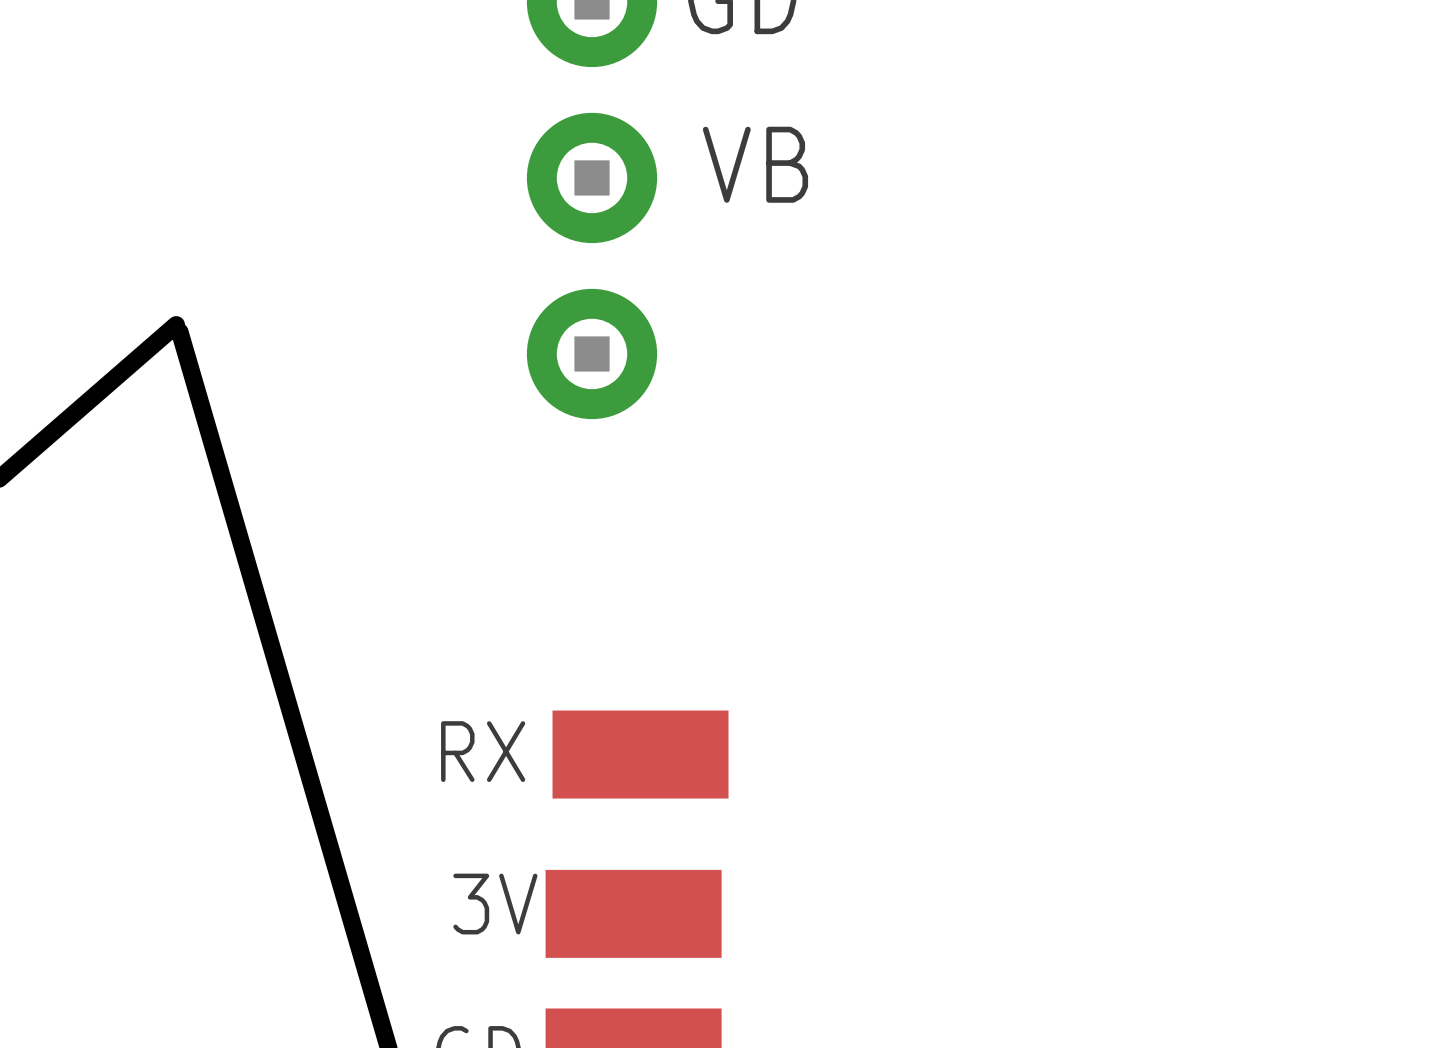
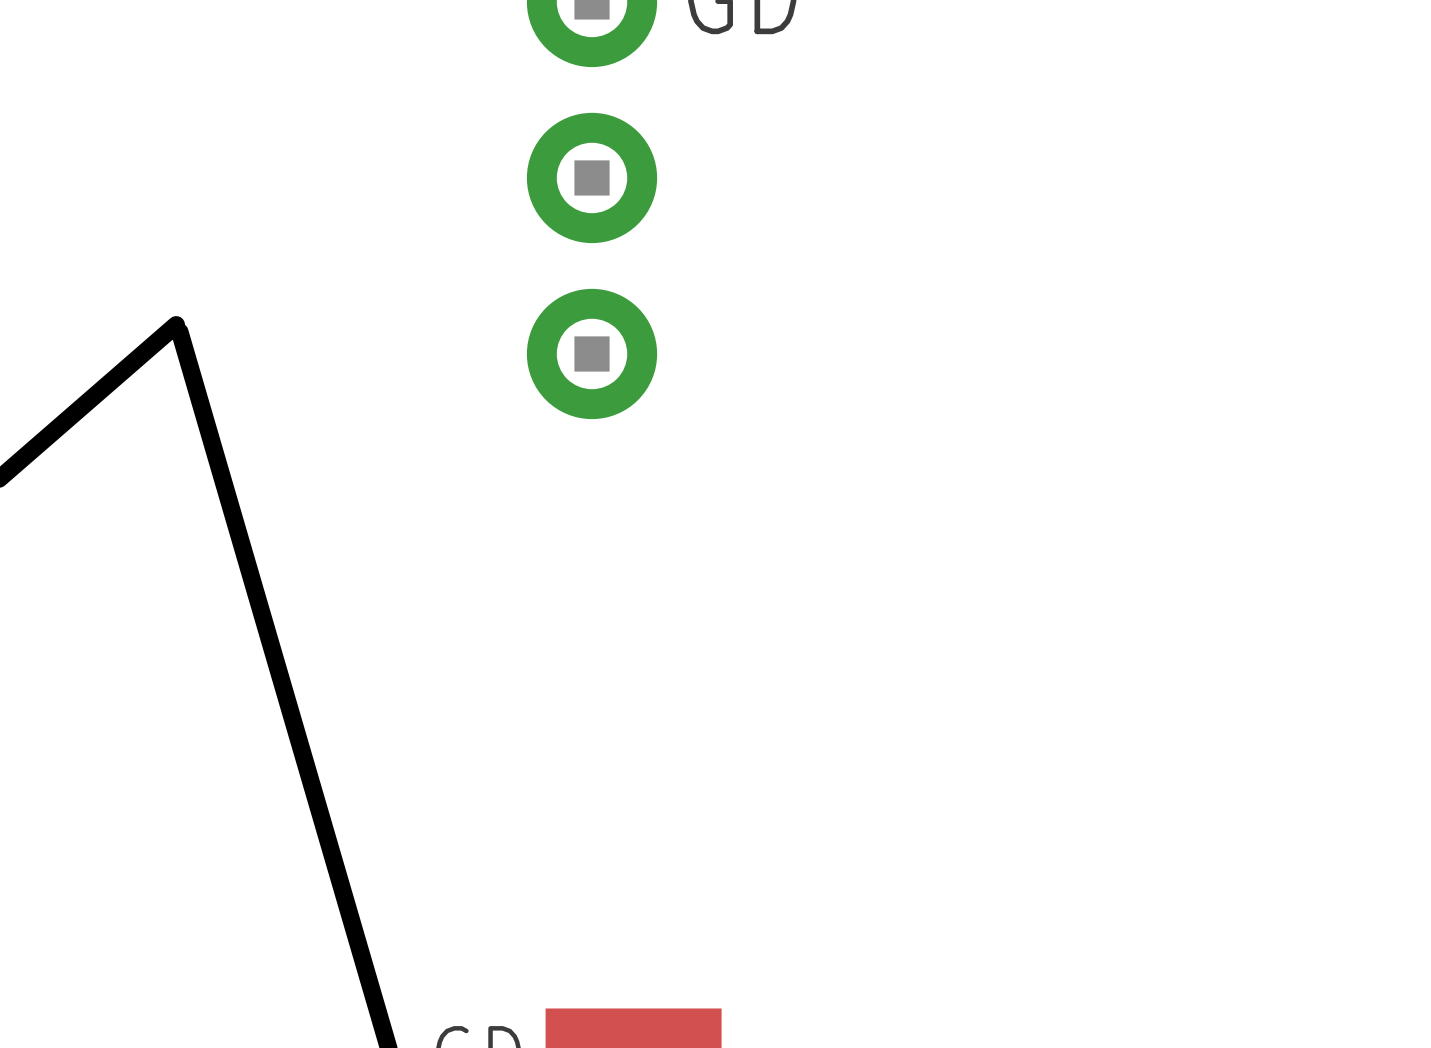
text: VB (755, 164) -> none
text: RX (483, 751) -> none
part: (640, 754) -> none
text: 3V (495, 904) -> none
part: (633, 913) -> none

